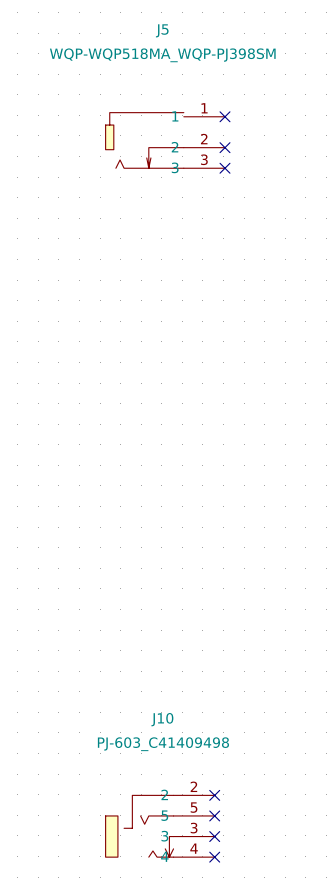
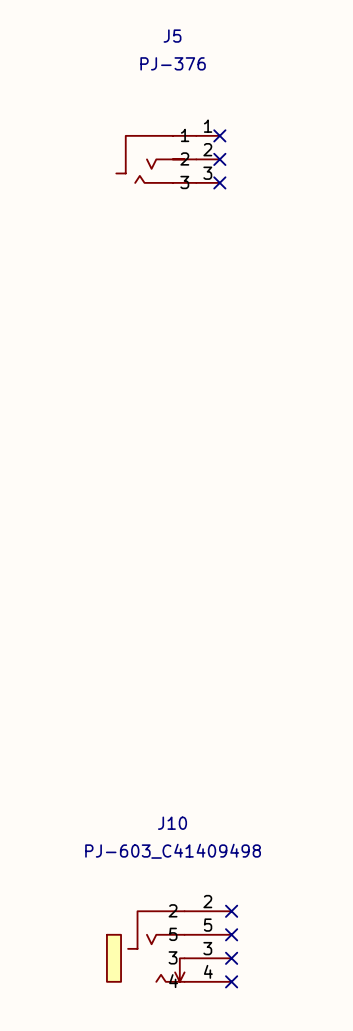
J5 value: WQP-WQP518MA_WQP-PJ398SM (162, 55) -> PJ-376 (173, 63)
J5 symbol: [105, 112, 225, 169] -> [116, 135, 220, 183]
no-connect mark: none -> (219, 135)
no-connect mark: (224, 116) -> none
no-connect mark: none -> (219, 159)
no-connect mark: (224, 147) -> none
no-connect mark: none -> (219, 182)
no-connect mark: (224, 168) -> none

